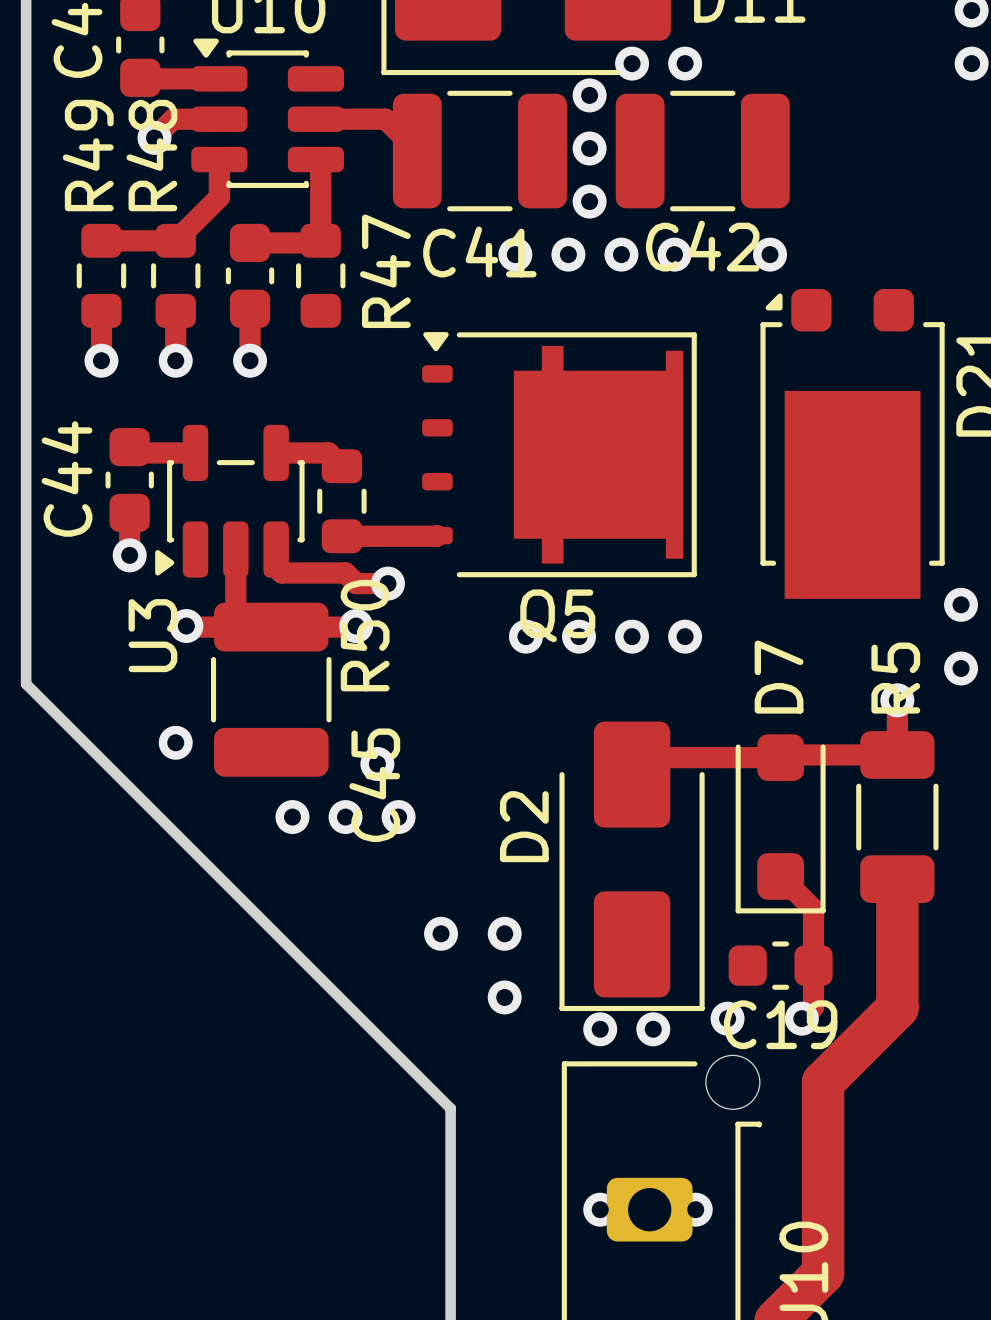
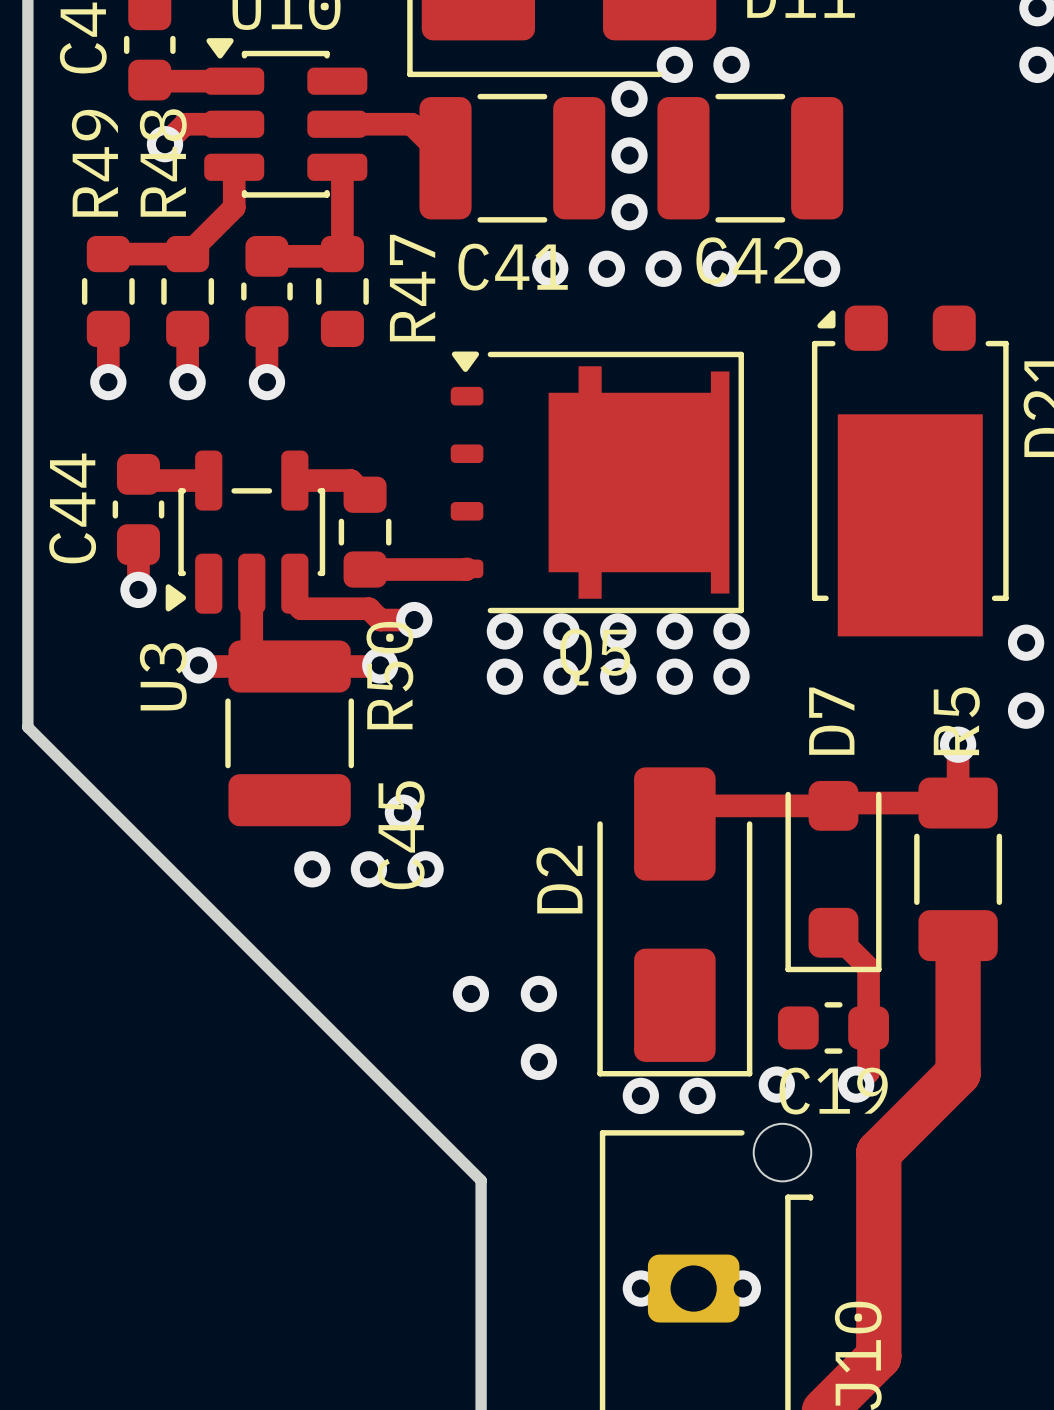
via: none -> (504, 631)
via: none -> (561, 631)
via: none -> (618, 631)
via: none -> (674, 631)
via: none -> (731, 631)
via: none -> (504, 676)
via: (175, 742) -> none

